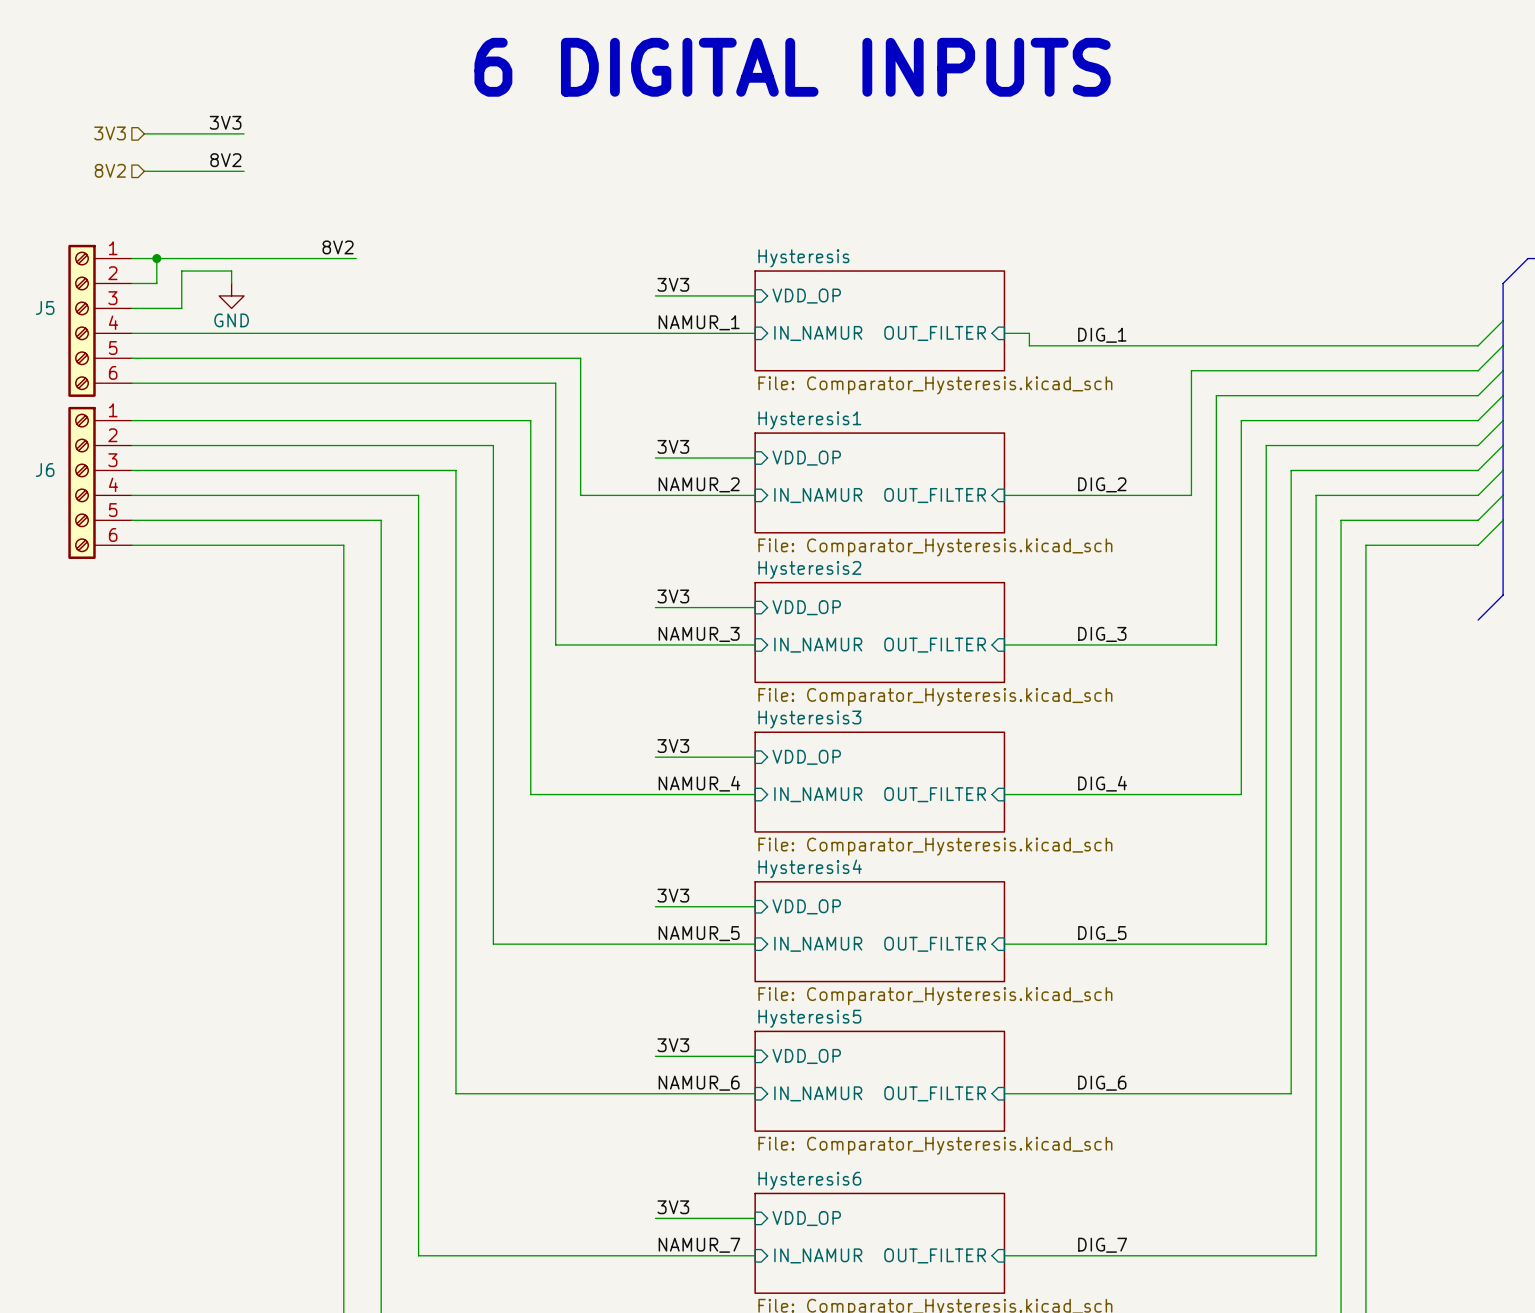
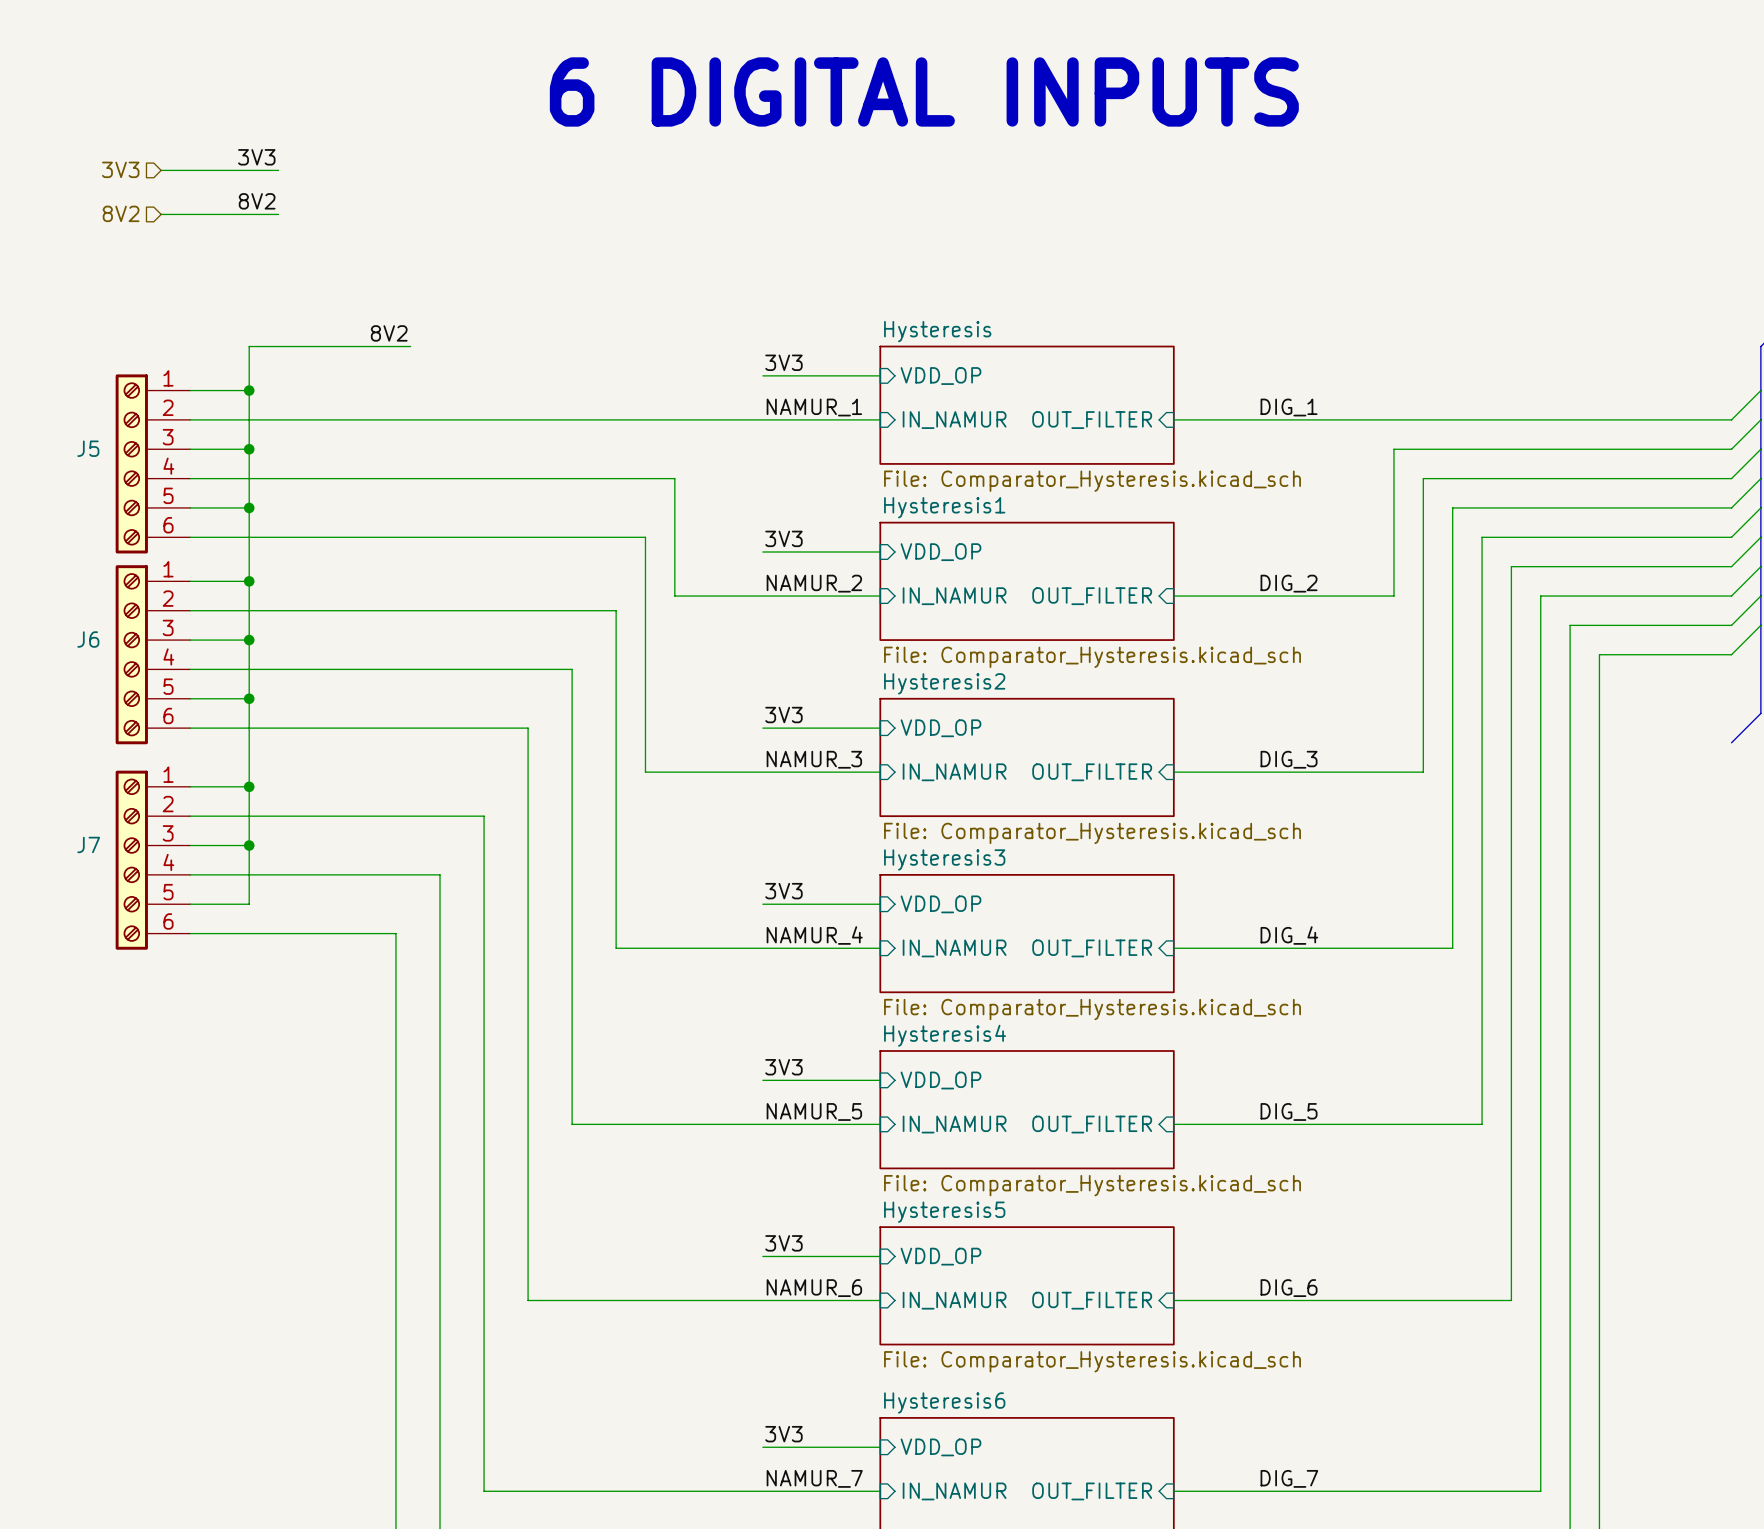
label position: 8V2 (338, 247) -> 8V2 (389, 333)
wire: (131, 258) (356, 258) -> none
wire: (156, 258) (156, 283) (131, 283) -> none
junction: (156, 258) -> none
wire: (231, 283) (231, 271) (181, 271) (181, 308) (131, 308) -> none
wire: none -> (410, 346) (249, 346) (249, 904) (190, 904)
label position: 3V3 (673, 284) -> 3V3 (783, 362)
power symbol: GND (231, 295) -> none
wire: (655, 295) (755, 295) -> (762, 375) (880, 375)
sheet pin position: VDD_OP (806, 296) -> VDD_OP (940, 376)
J5 position: (100, 320) -> (153, 463)
wire: none -> (190, 390) (249, 390)
junction: none -> (249, 390)
sheet Hysteresis position: (879, 320) -> (1027, 405)
label position: NAMUR_1 (699, 322) -> NAMUR_1 (814, 407)
wire: (131, 333) (755, 333) -> none
sheet pin position: IN_NAMUR (818, 333) -> IN_NAMUR (954, 420)
sheet pin position: OUT_FILTER (935, 333) -> OUT_FILTER (1092, 420)
wire: (1004, 333) (1029, 333) (1029, 345) -> (1173, 419) (1203, 419)
wire: none -> (190, 419) (880, 419)
wire: (131, 358) (580, 358) (580, 395) -> (190, 478) (674, 478)
wire: none -> (190, 449) (249, 449)
junction: none -> (249, 449)
wire: (131, 383) (555, 383) (555, 445) -> none
wire: (219, 420) (530, 420) (530, 507) -> (190, 610) (616, 610)
junction: none -> (249, 507)
wire: (493, 445) (493, 557) -> (572, 537) (645, 537)
wire: (131, 470) (455, 470) (455, 607) -> (190, 728) (528, 728)
J6 position: (100, 482) -> (153, 654)
wire: none -> (190, 581) (249, 581)
junction: none -> (249, 581)
wire: (131, 495) (418, 495) (418, 682) -> (190, 816) (484, 816)
wire: (131, 520) (381, 520) (381, 732) -> (190, 874) (440, 874)
wire: none -> (190, 640) (249, 640)
junction: none -> (249, 640)
wire: (131, 545) (343, 545) (343, 782) -> (190, 933) (395, 933)
wire: none -> (190, 669) (572, 669)
wire: none -> (190, 698) (249, 698)
junction: none -> (249, 698)
wire: none -> (190, 786) (249, 786)
junction: none -> (249, 786)
wire: none -> (190, 845) (249, 845)
junction: none -> (249, 845)
J7: none -> (153, 860)

